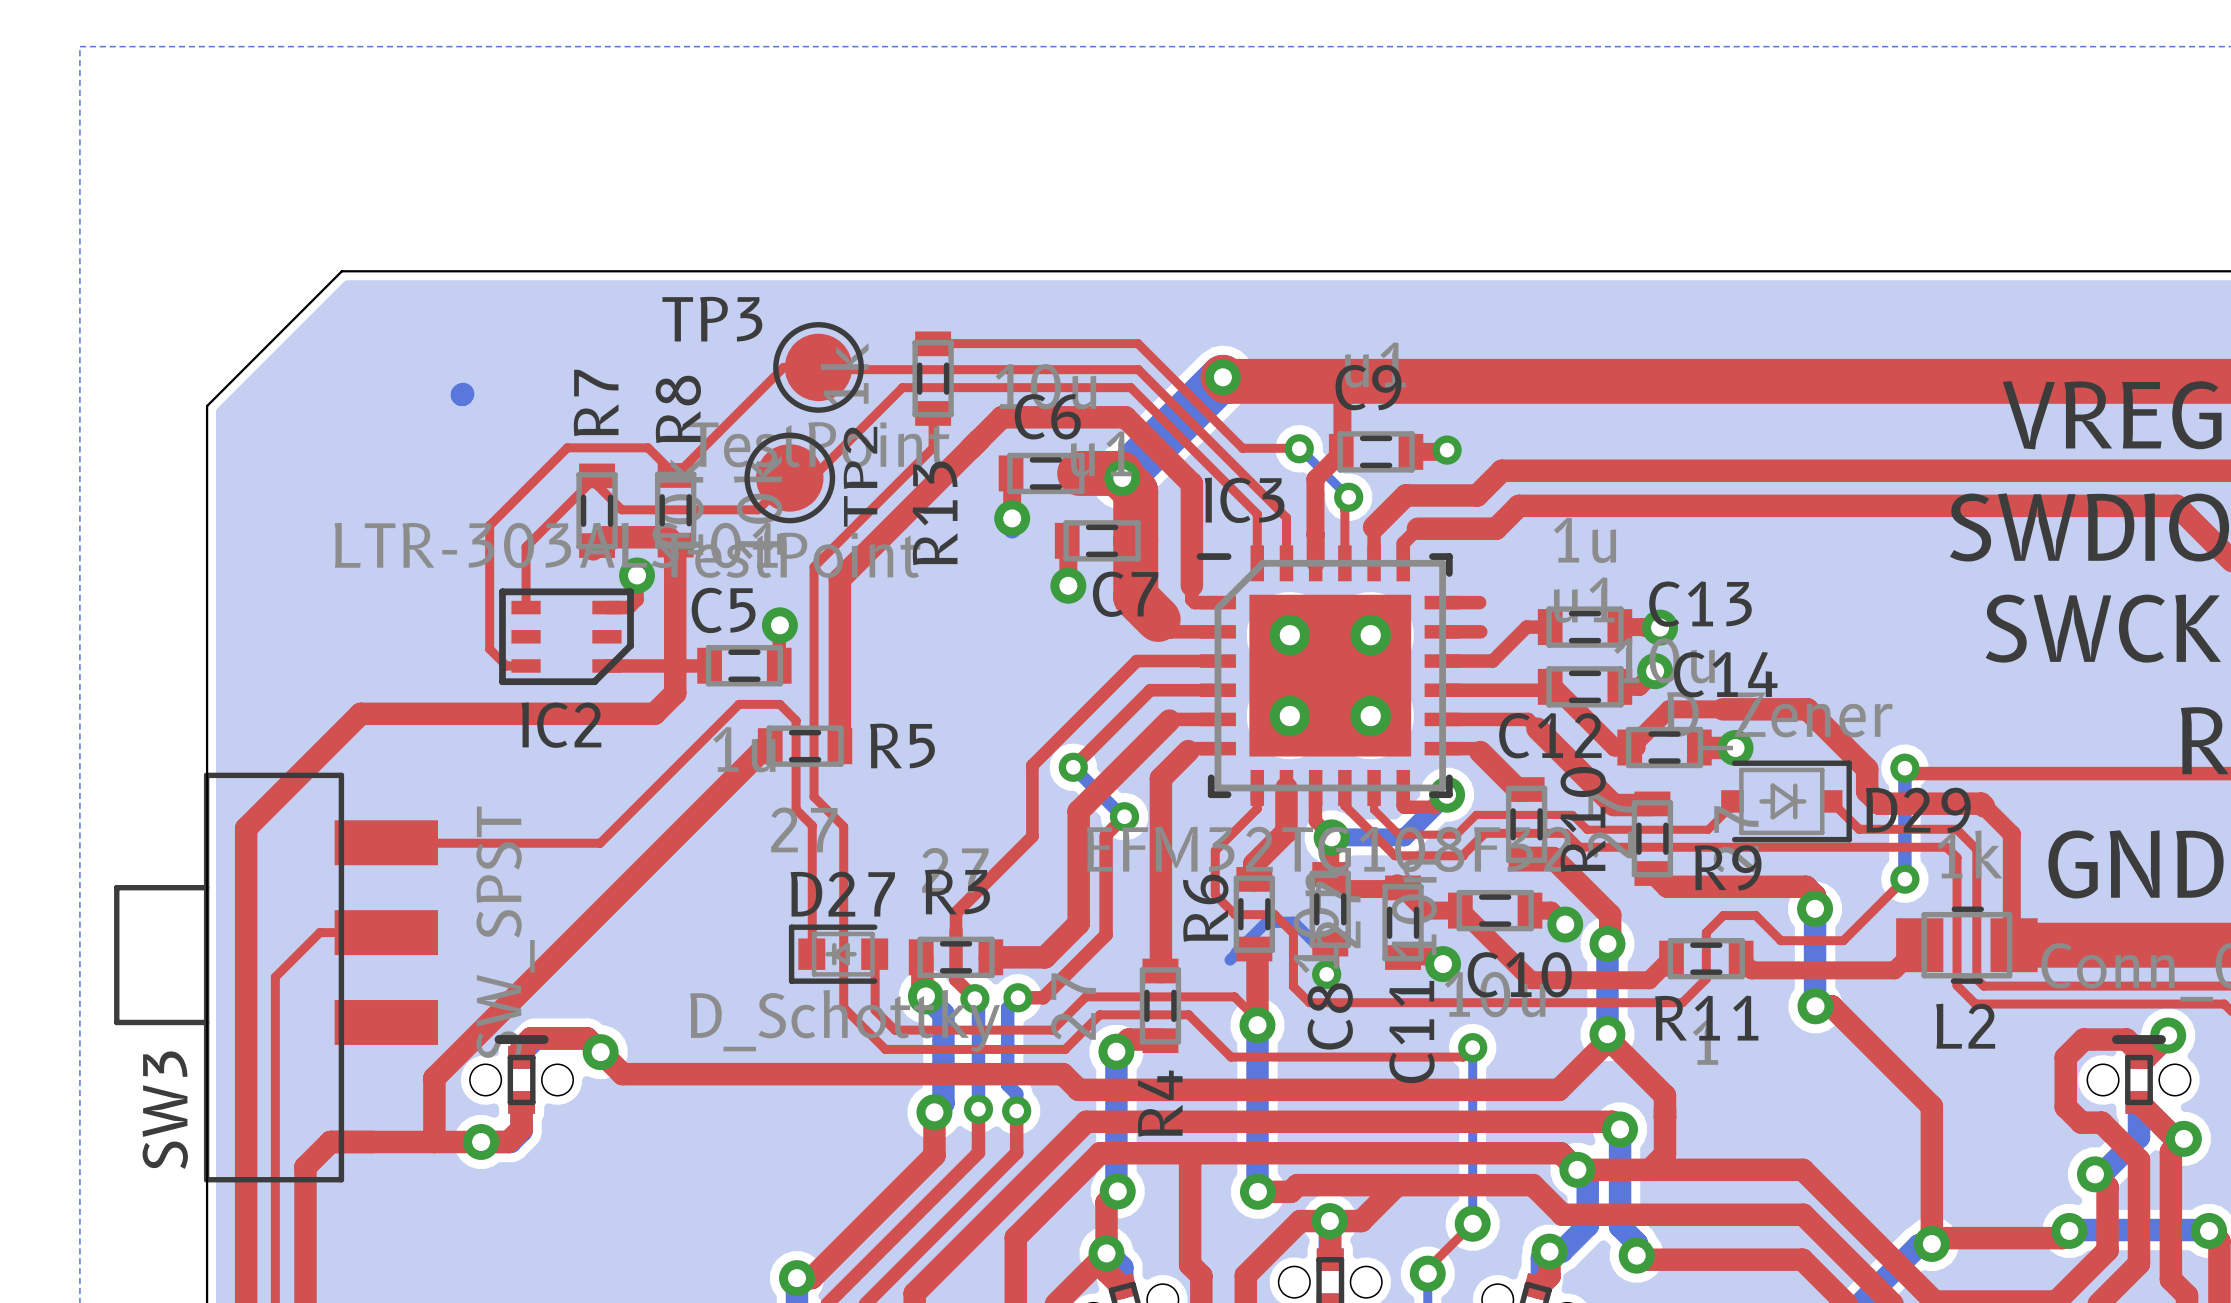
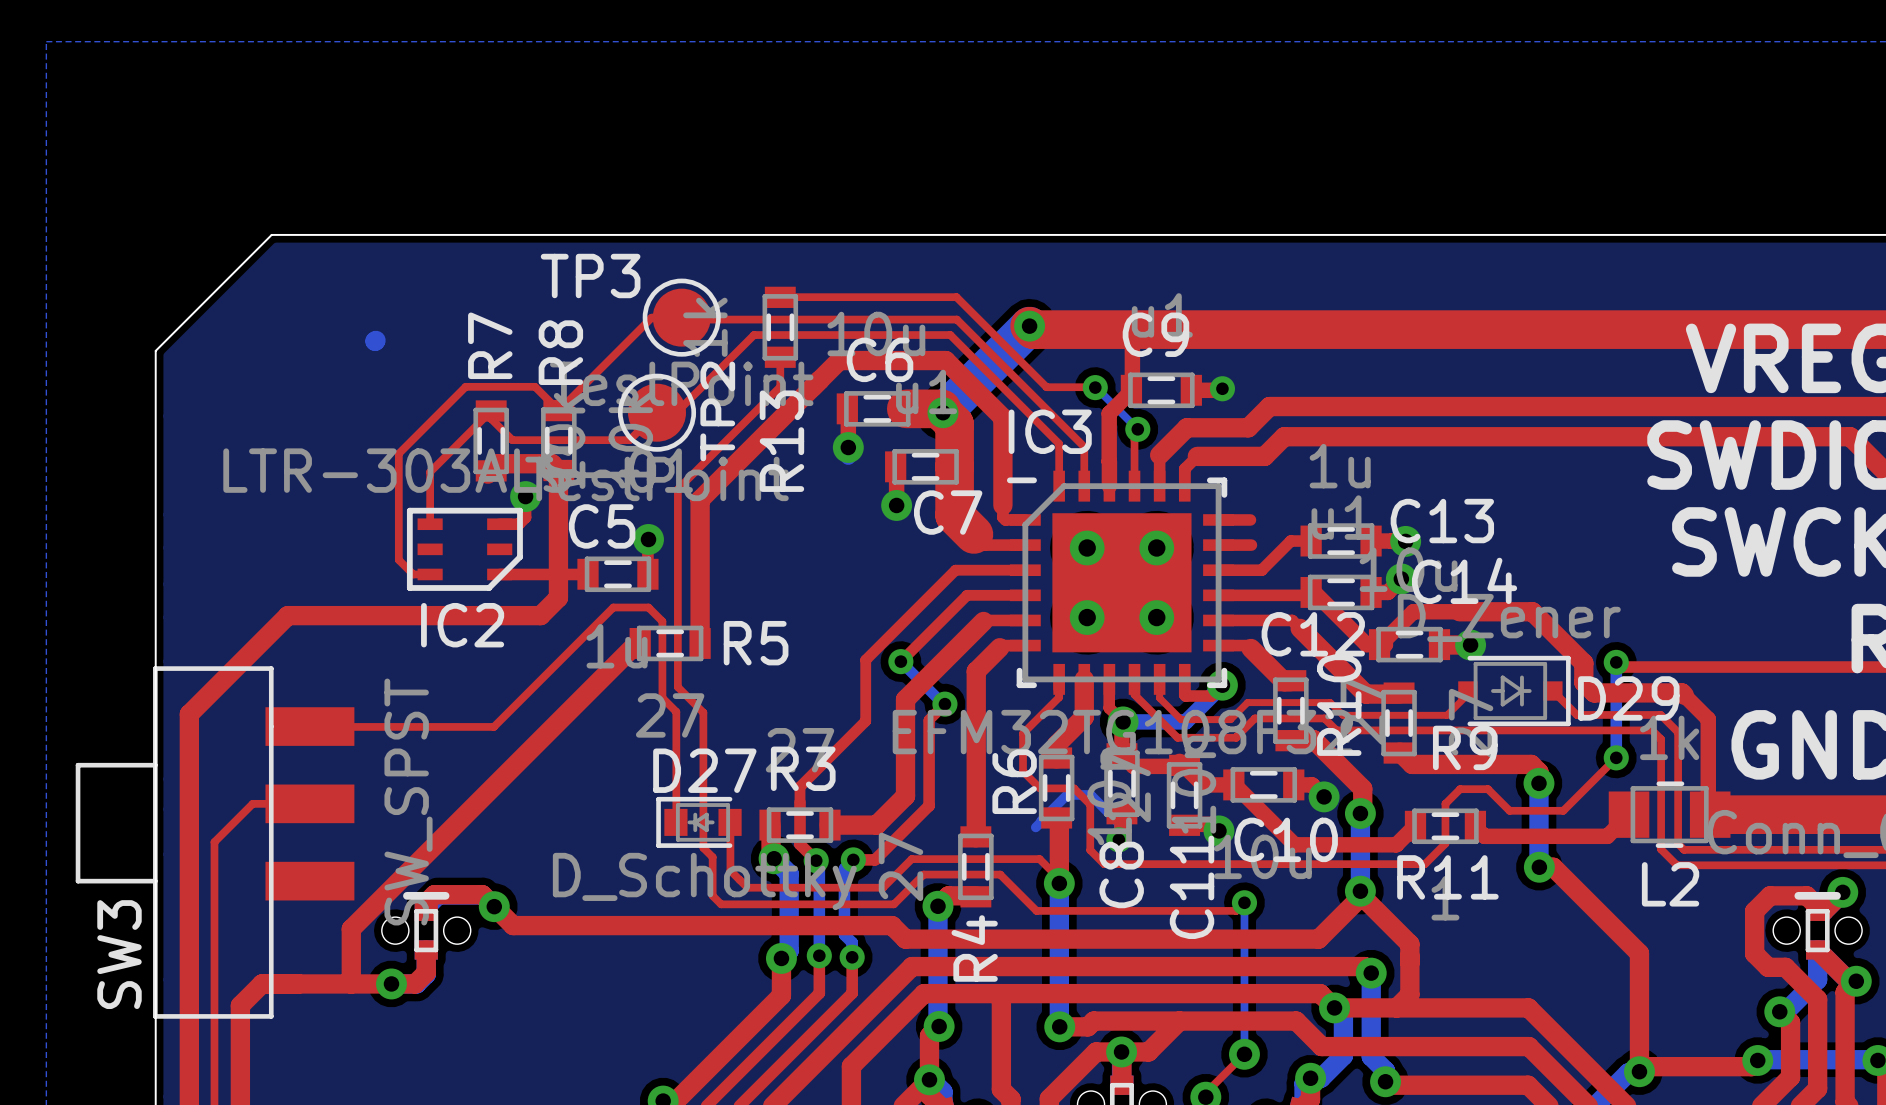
top track: (843, 983) (843, 1007) (885, 1049) -> (703, 847) (712, 857) (712, 895) (721, 904) (739, 904)

